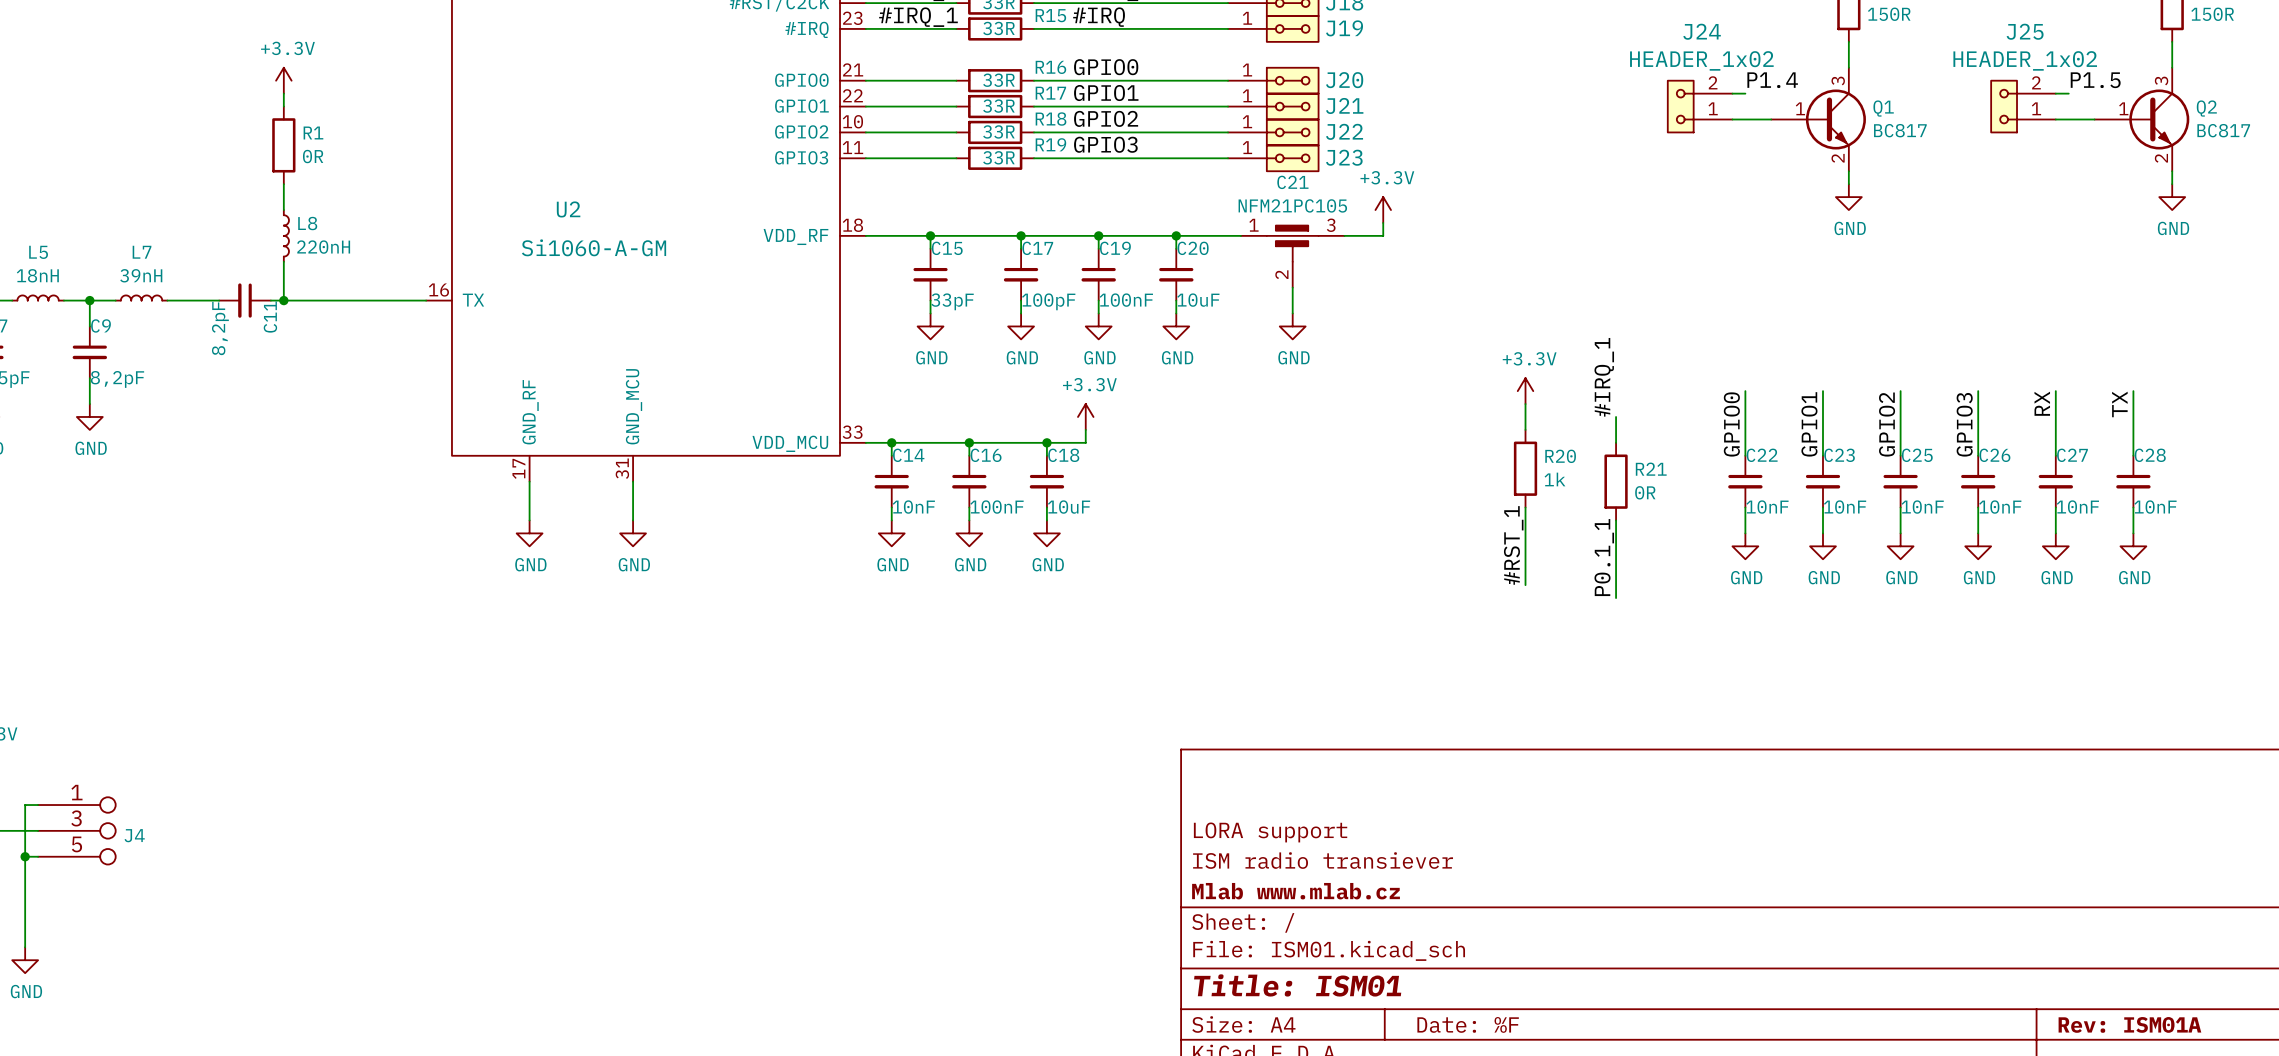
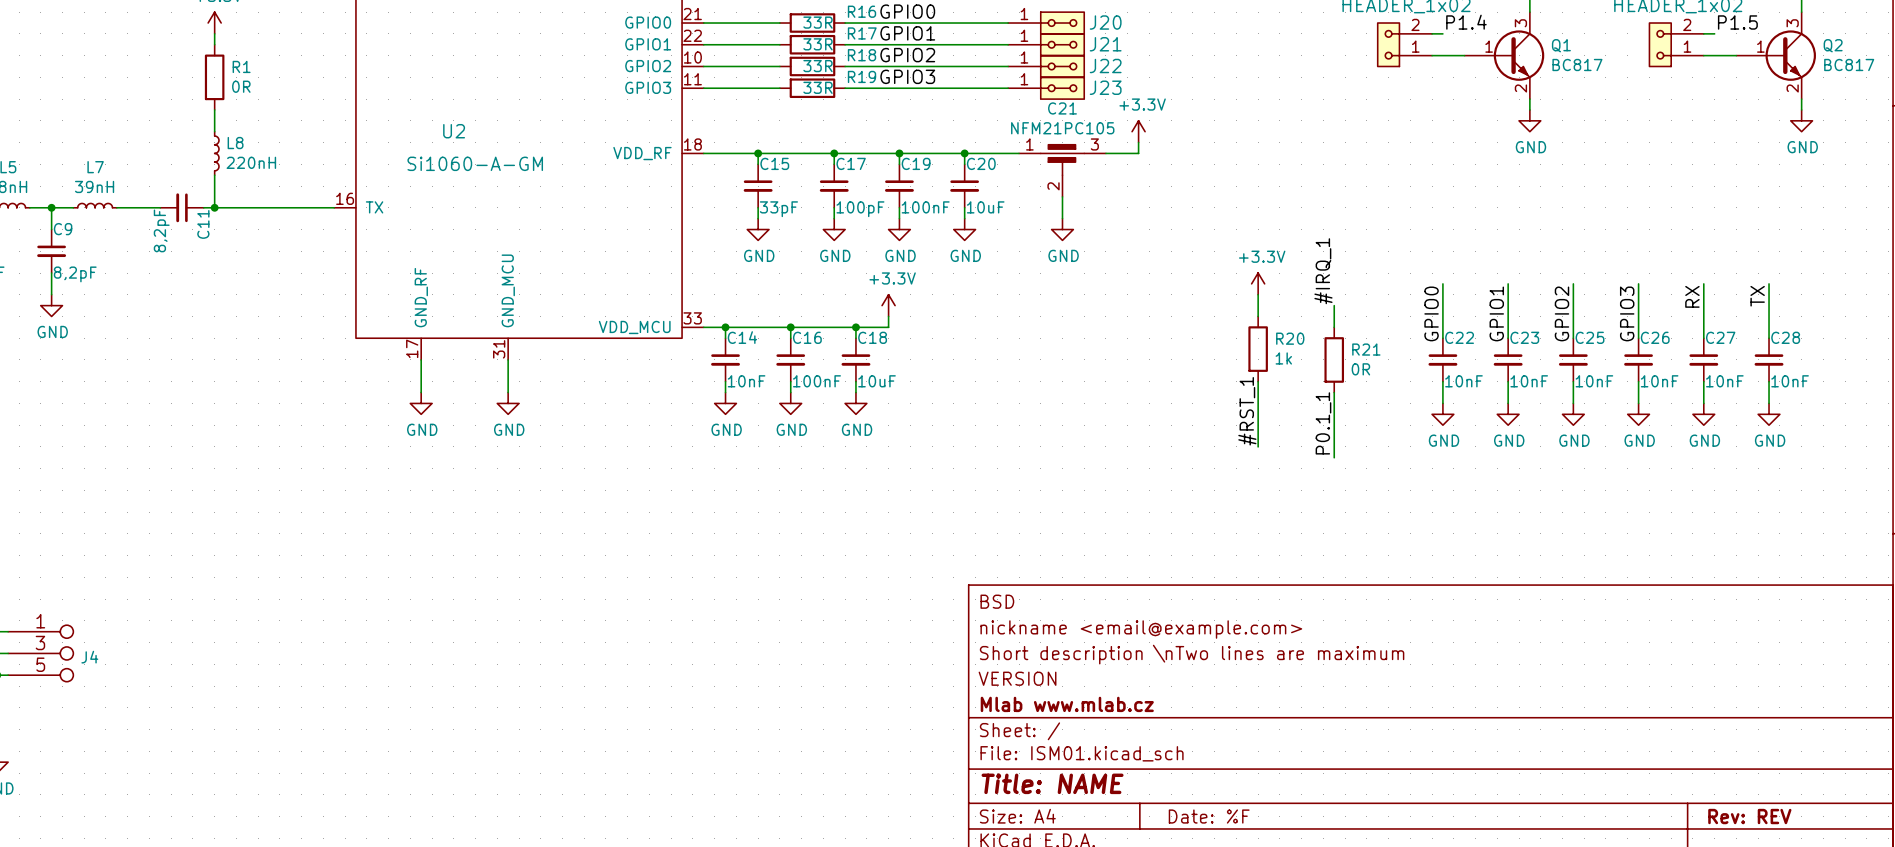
title block: none -> BSD (997, 601)
title block: none -> nickname <email@example.com> (1141, 629)
title block: LORA support (1270, 832) -> Short description \nTwo lines are maximum (1192, 654)
title block: ISM radio transiever (1323, 860) -> VERSION (1017, 678)
title block: Title: ISM01 (1297, 985) -> Title: NAME (1052, 783)
title block: Rev: ISM01A (2129, 1024) -> Rev: REV (1749, 816)

